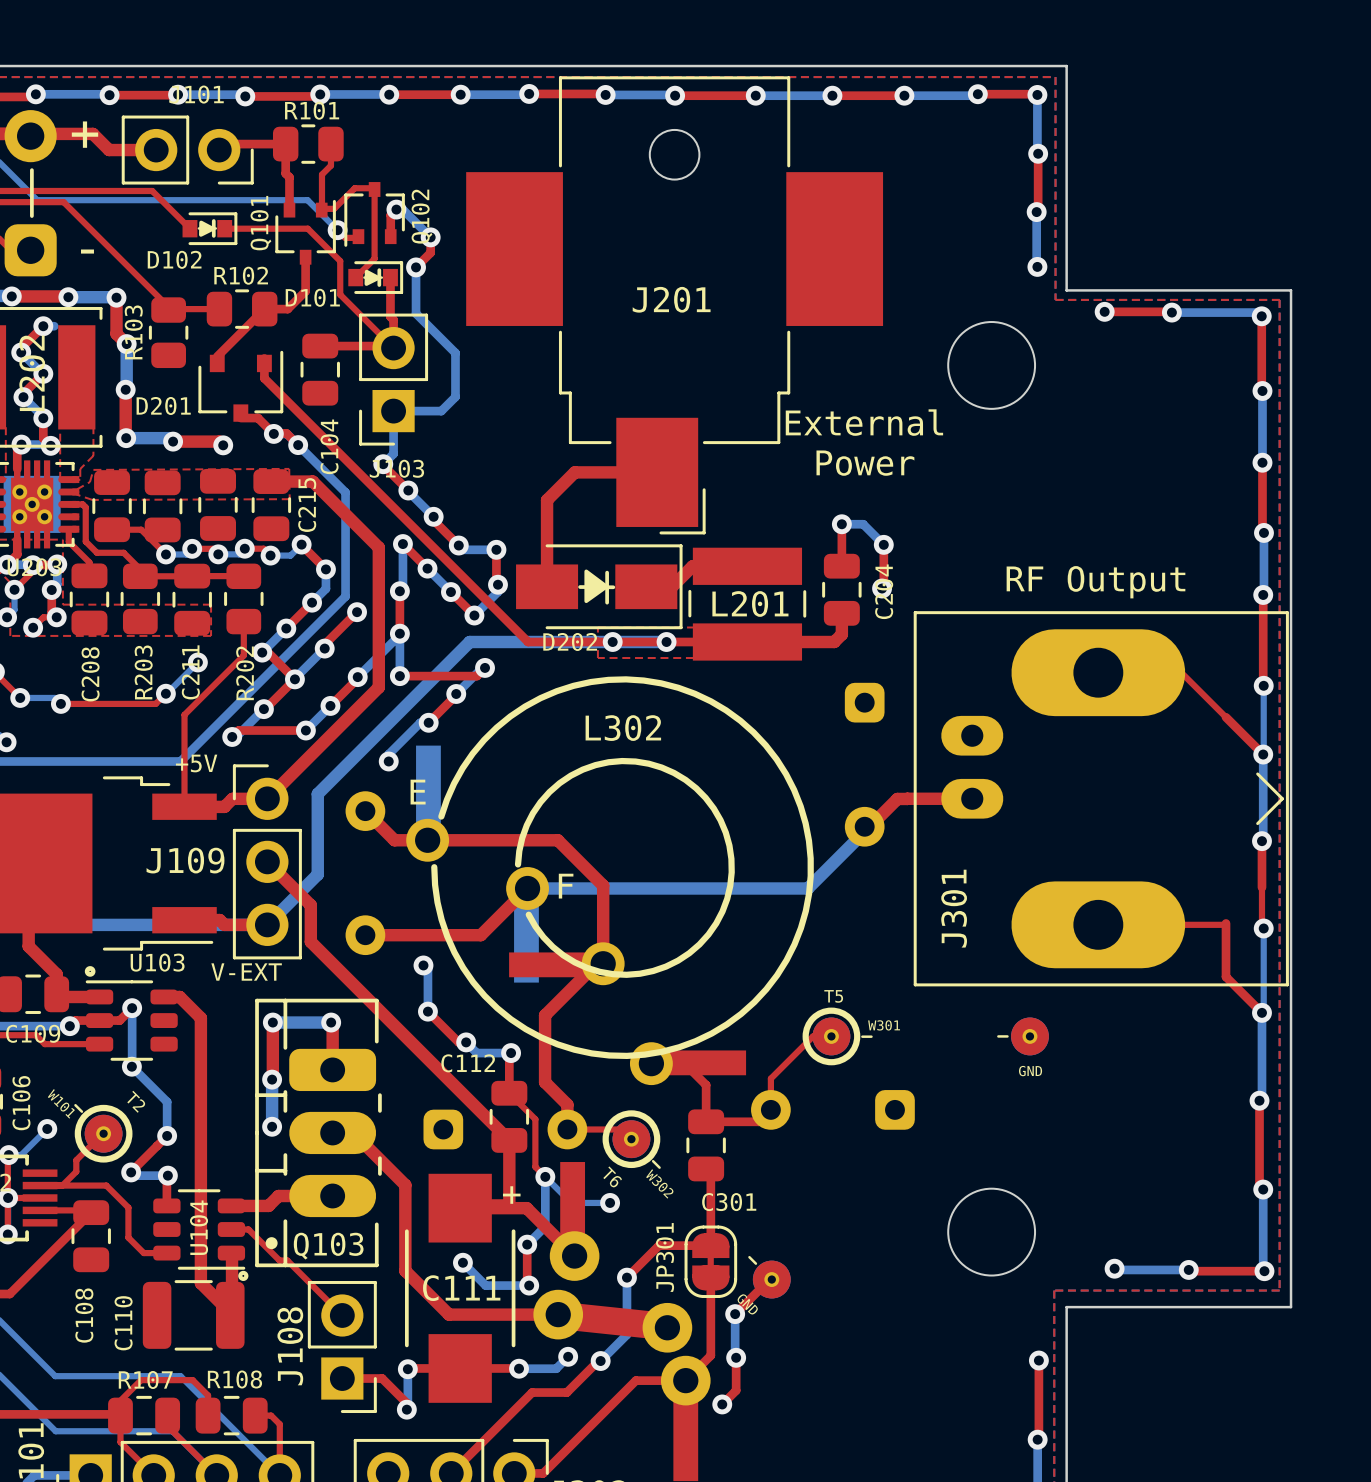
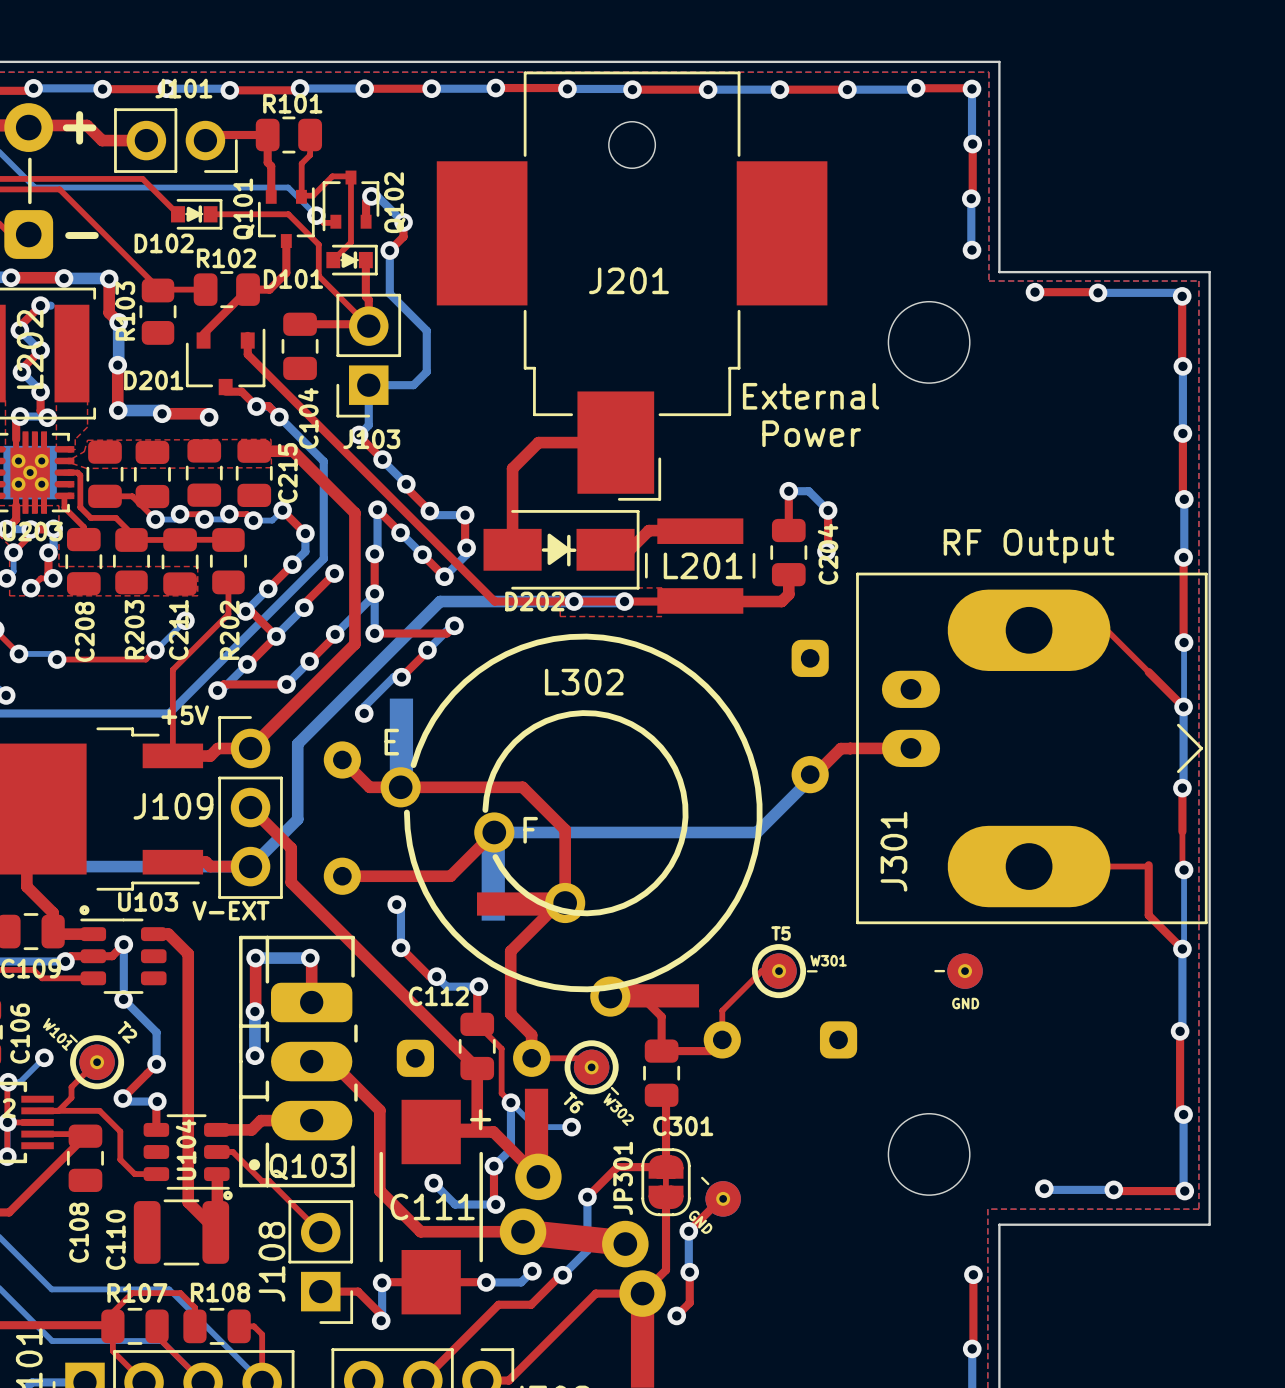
L201 footprint: [688, 547, 807, 661] -> [644, 518, 756, 614]

